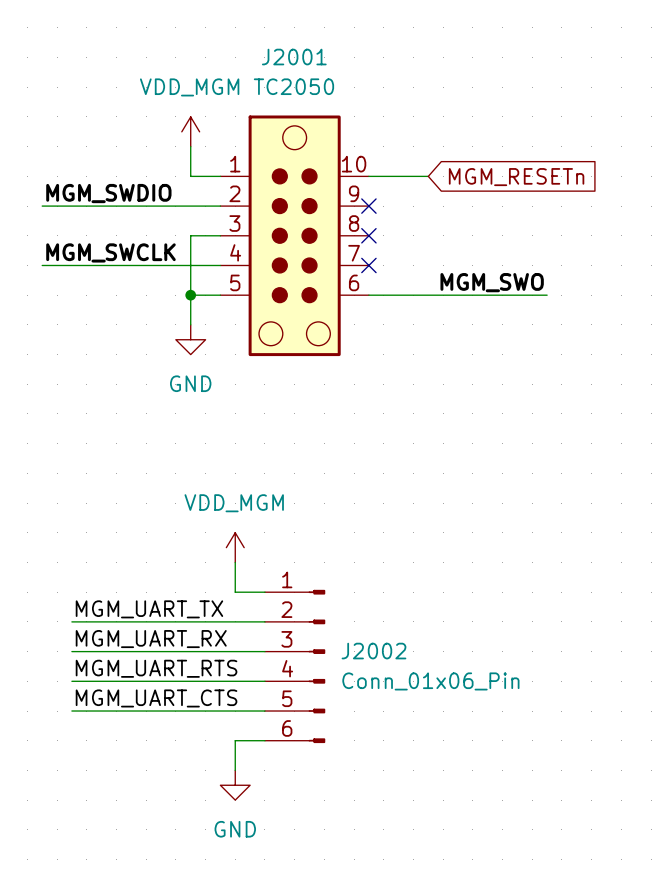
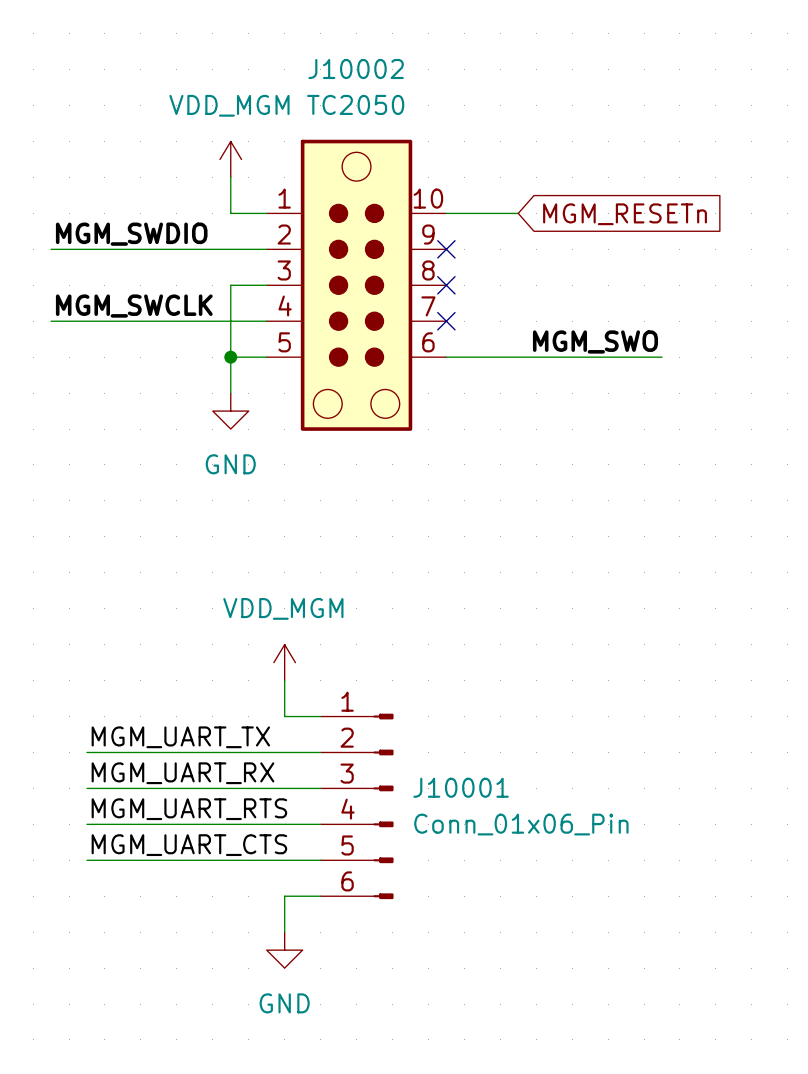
J2001 name: J2001 (294, 57) -> J10002 (356, 68)
J2002 name: J2002 (373, 651) -> J10001 (461, 787)

